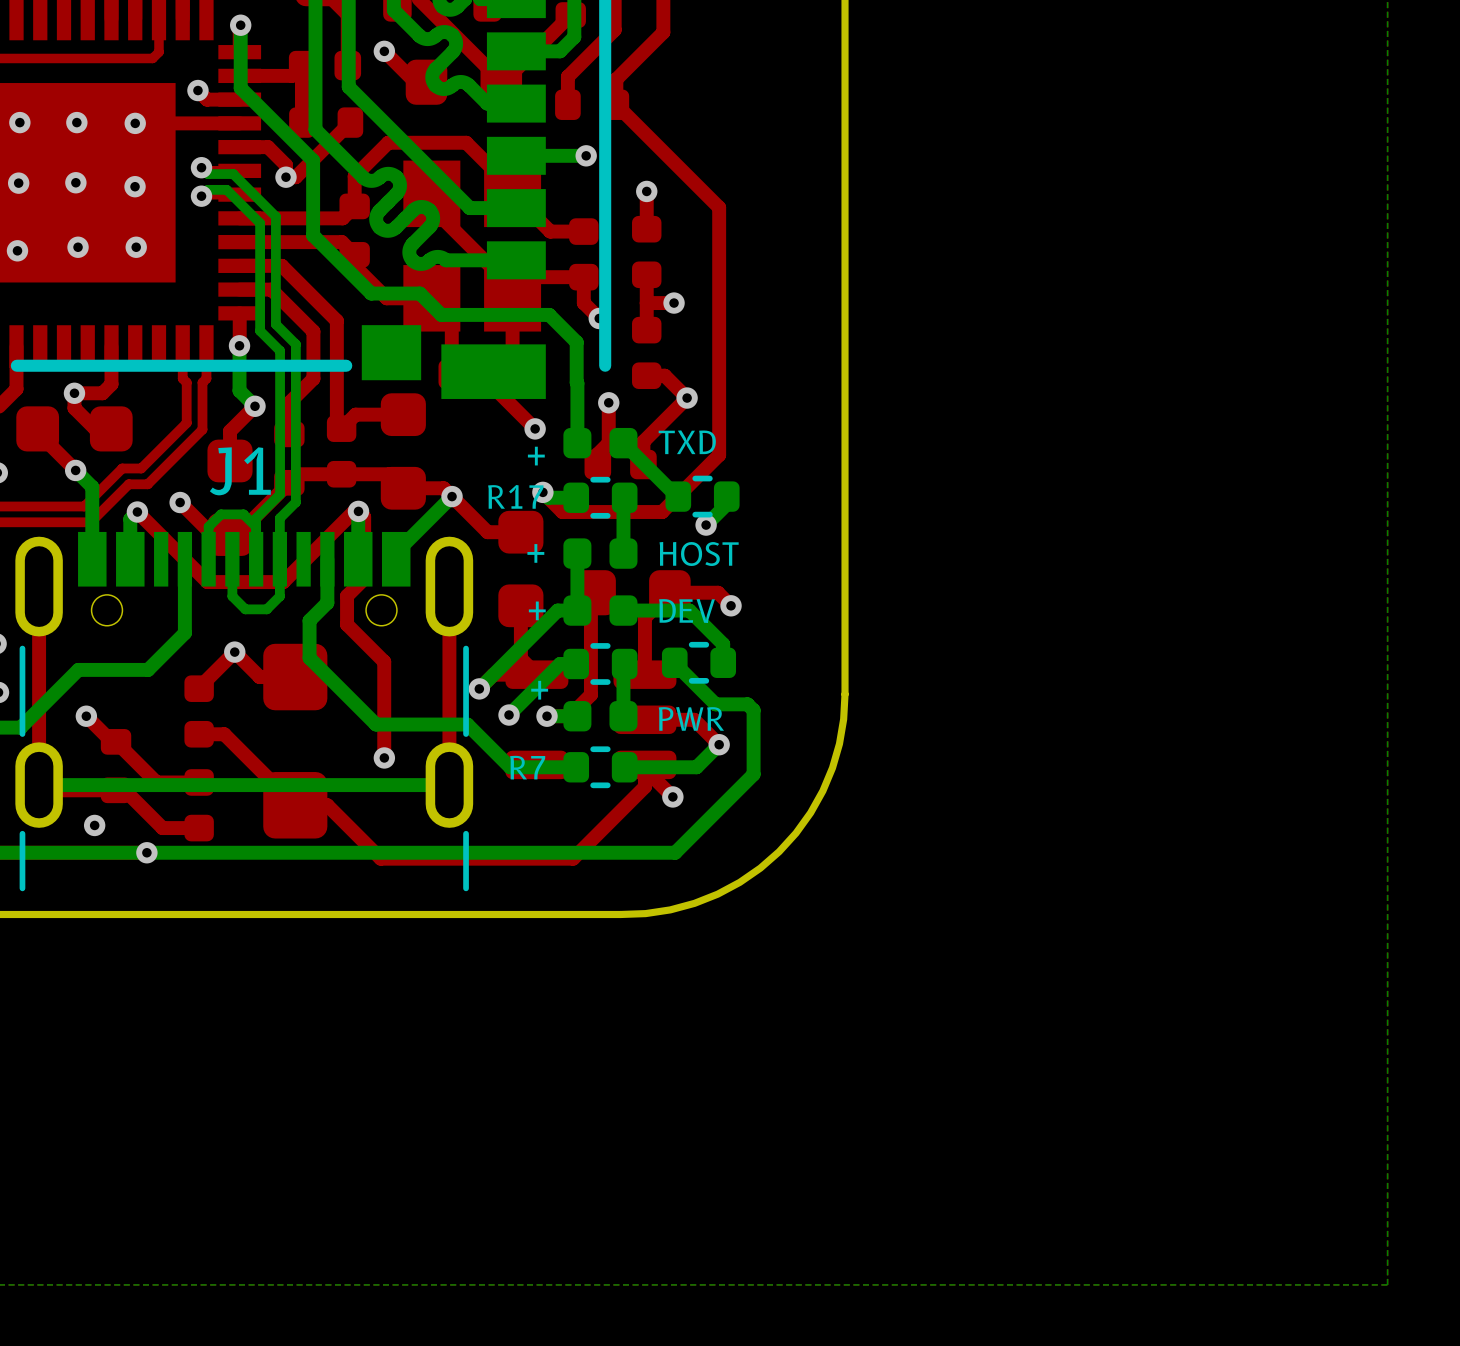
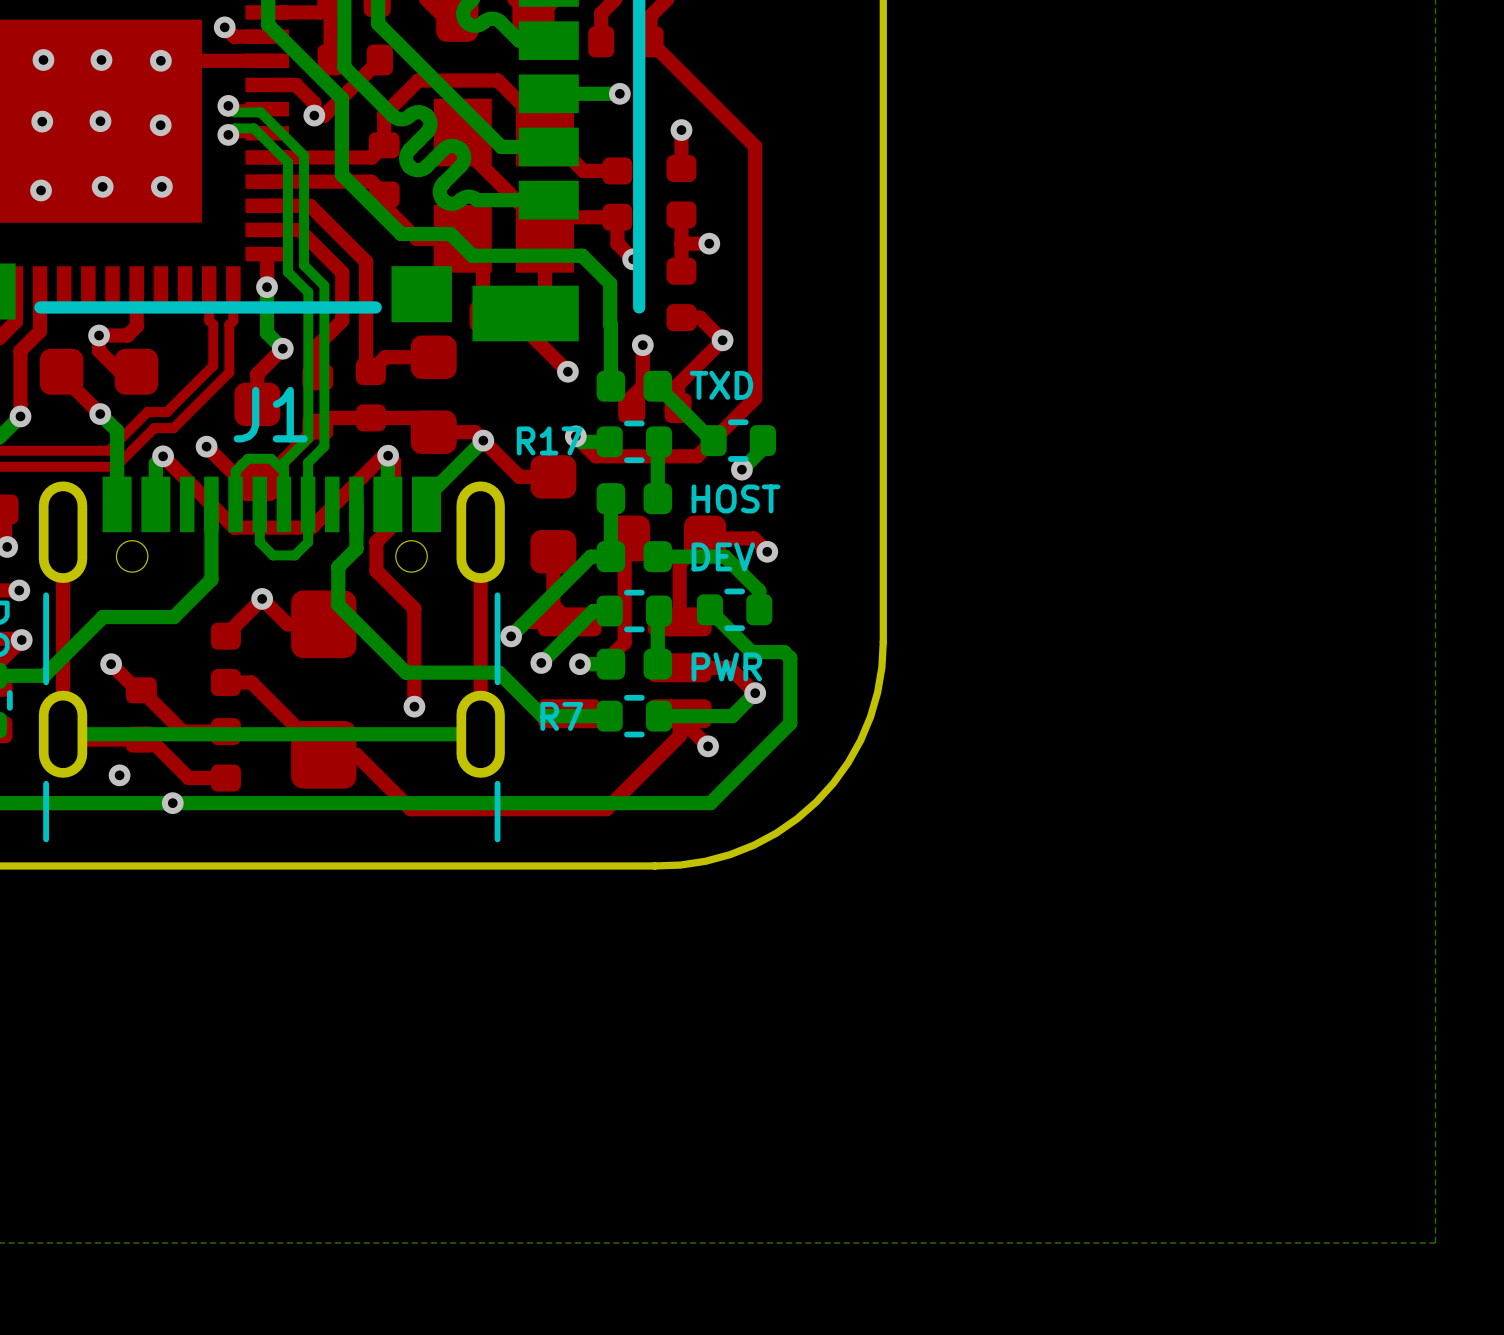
text: + (536, 456) -> none
text: + (535, 553) -> none
text: + (537, 610) -> none
text: + (539, 690) -> none

